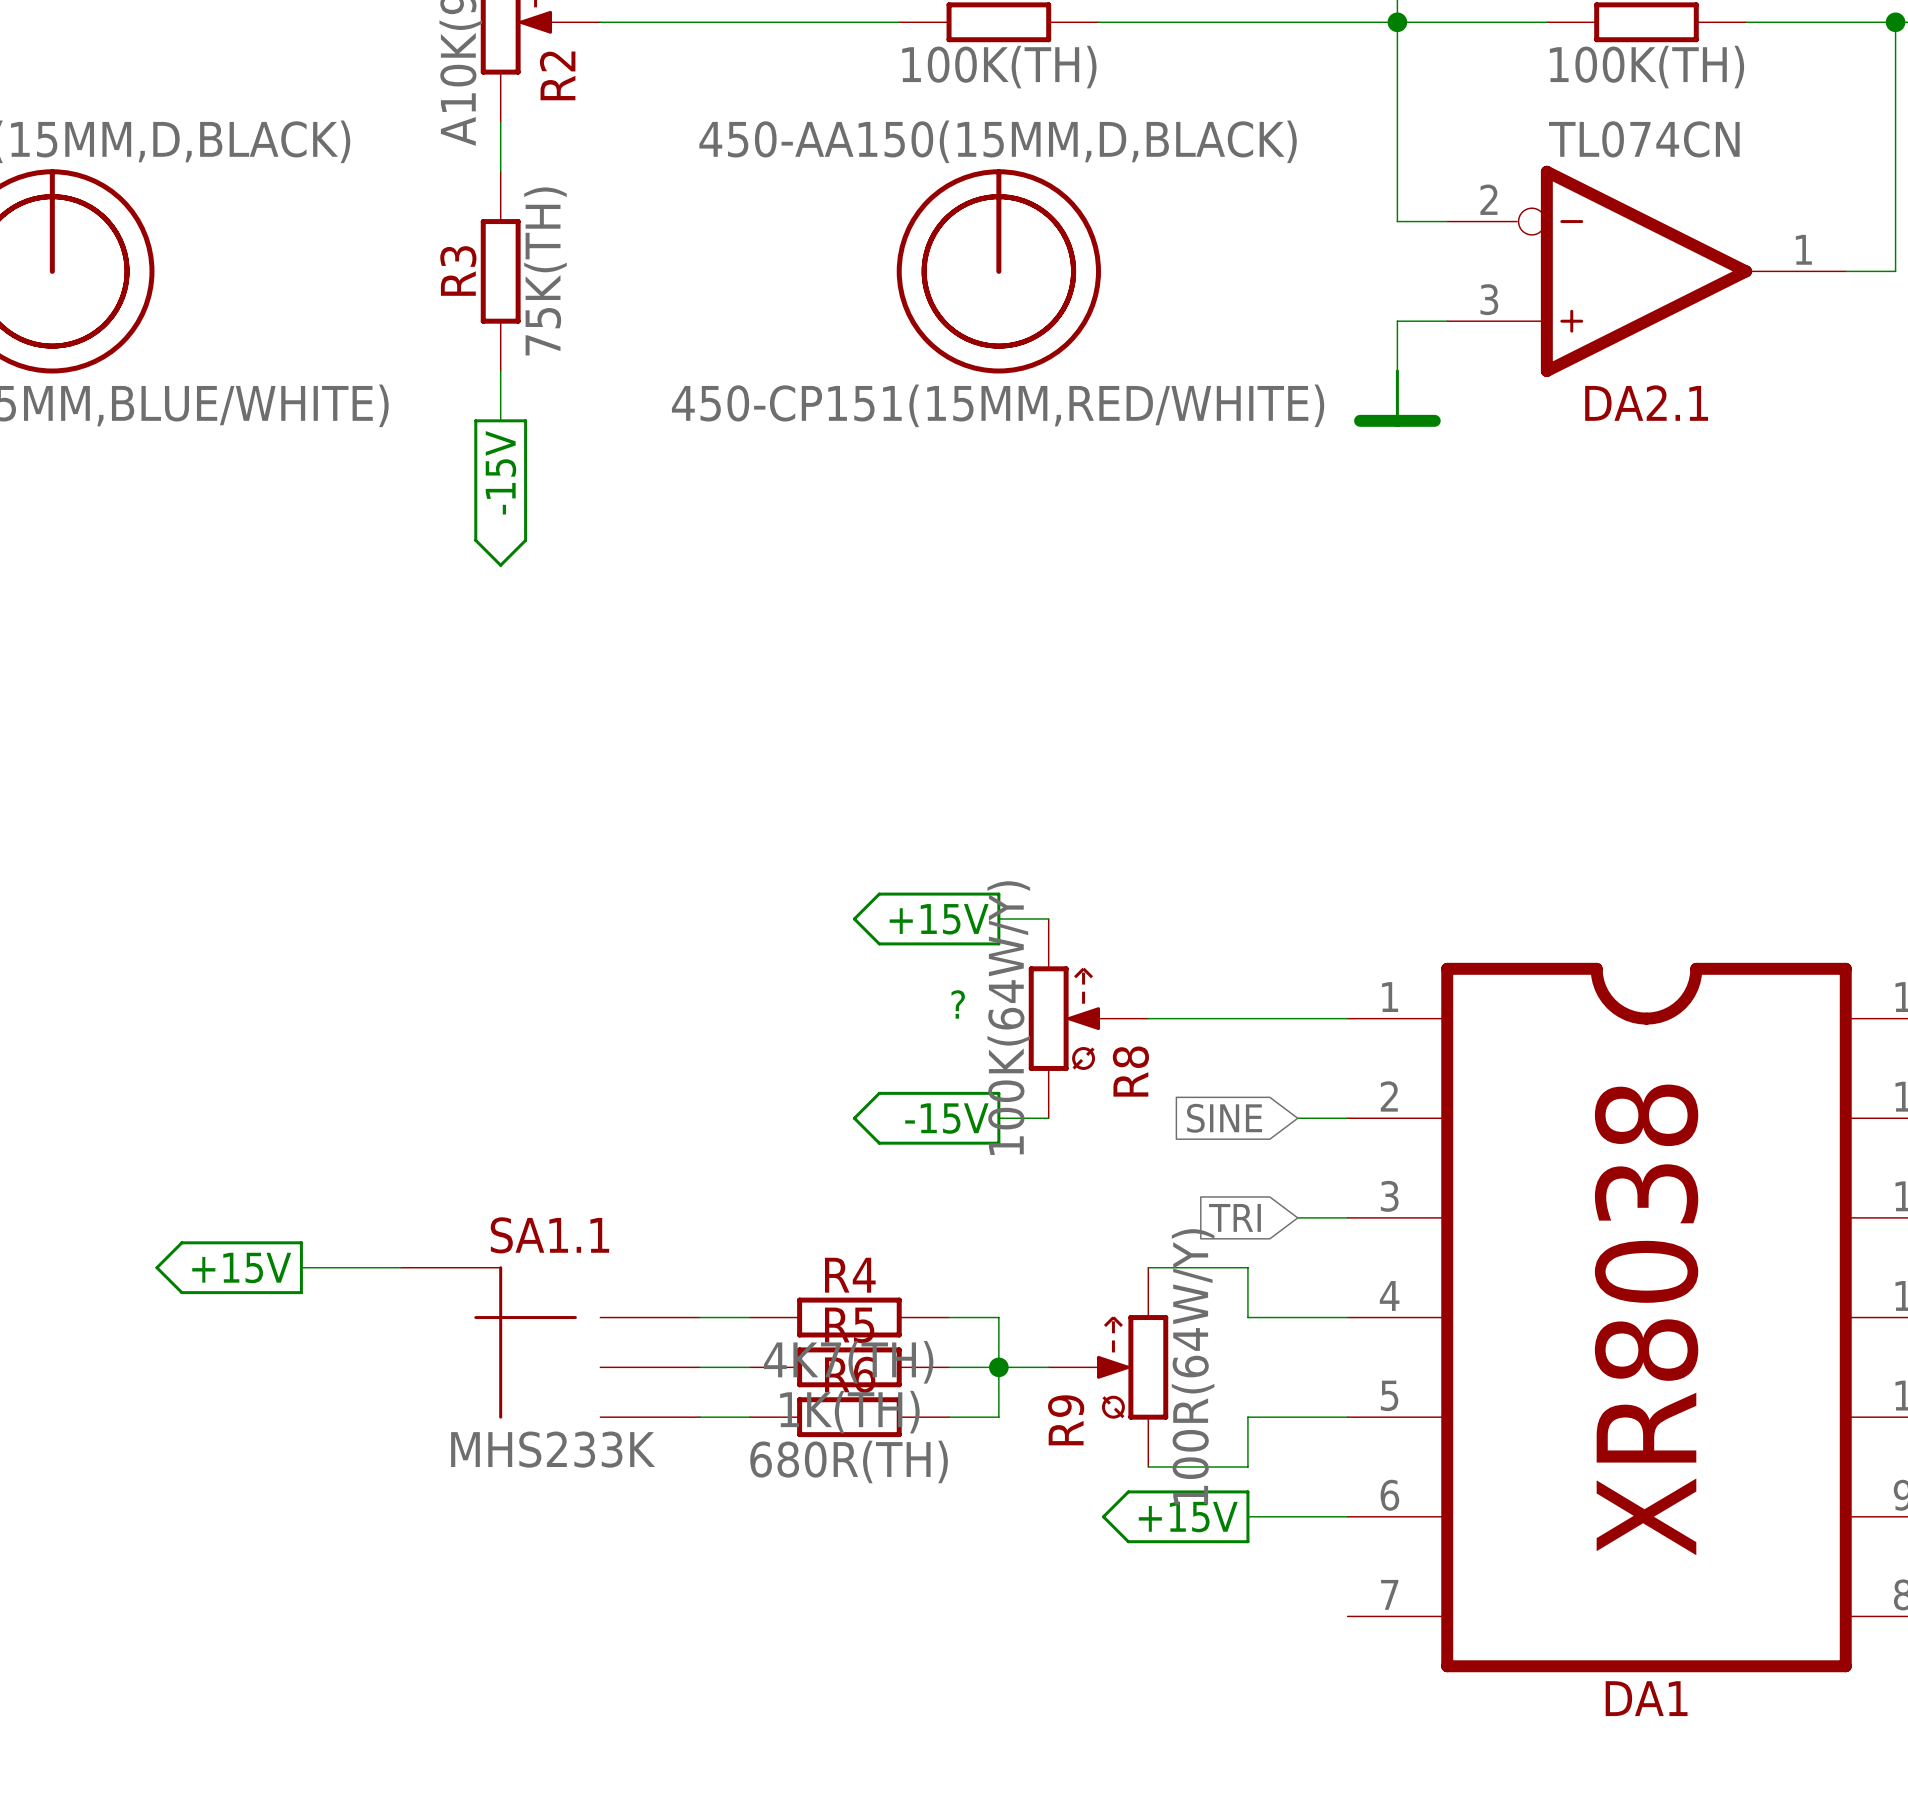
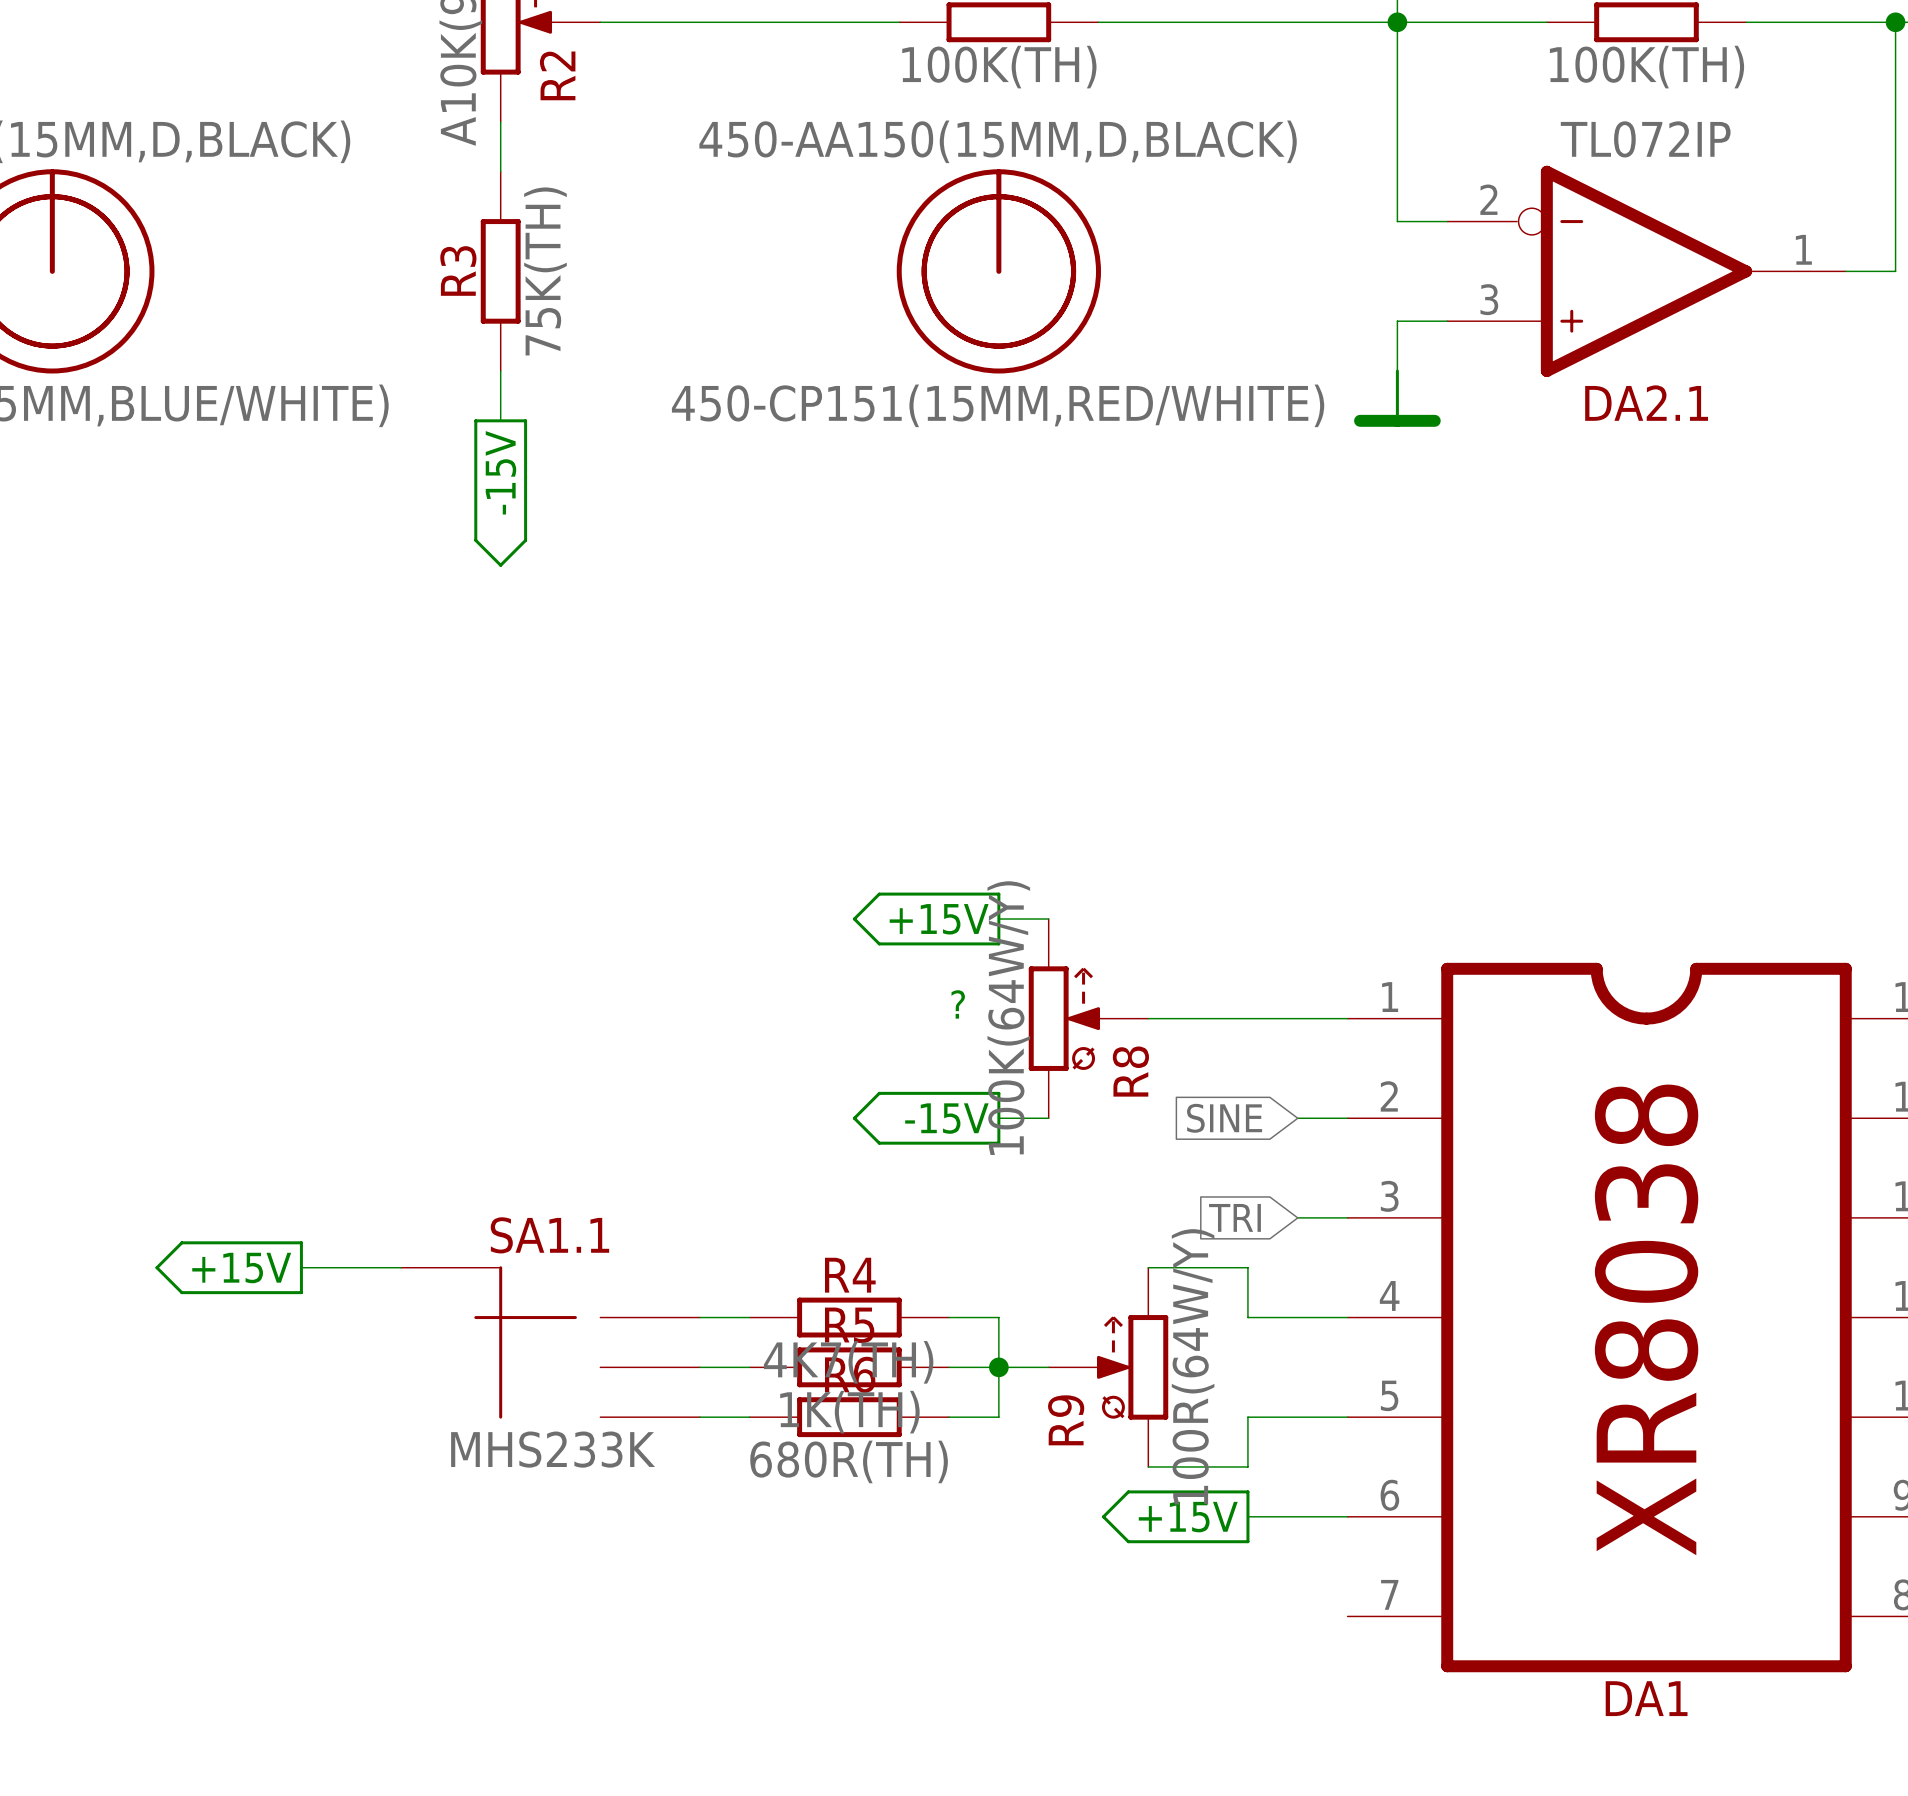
DA2.1 value: TL074CN (1644, 139) -> TL072IP (1645, 139)

